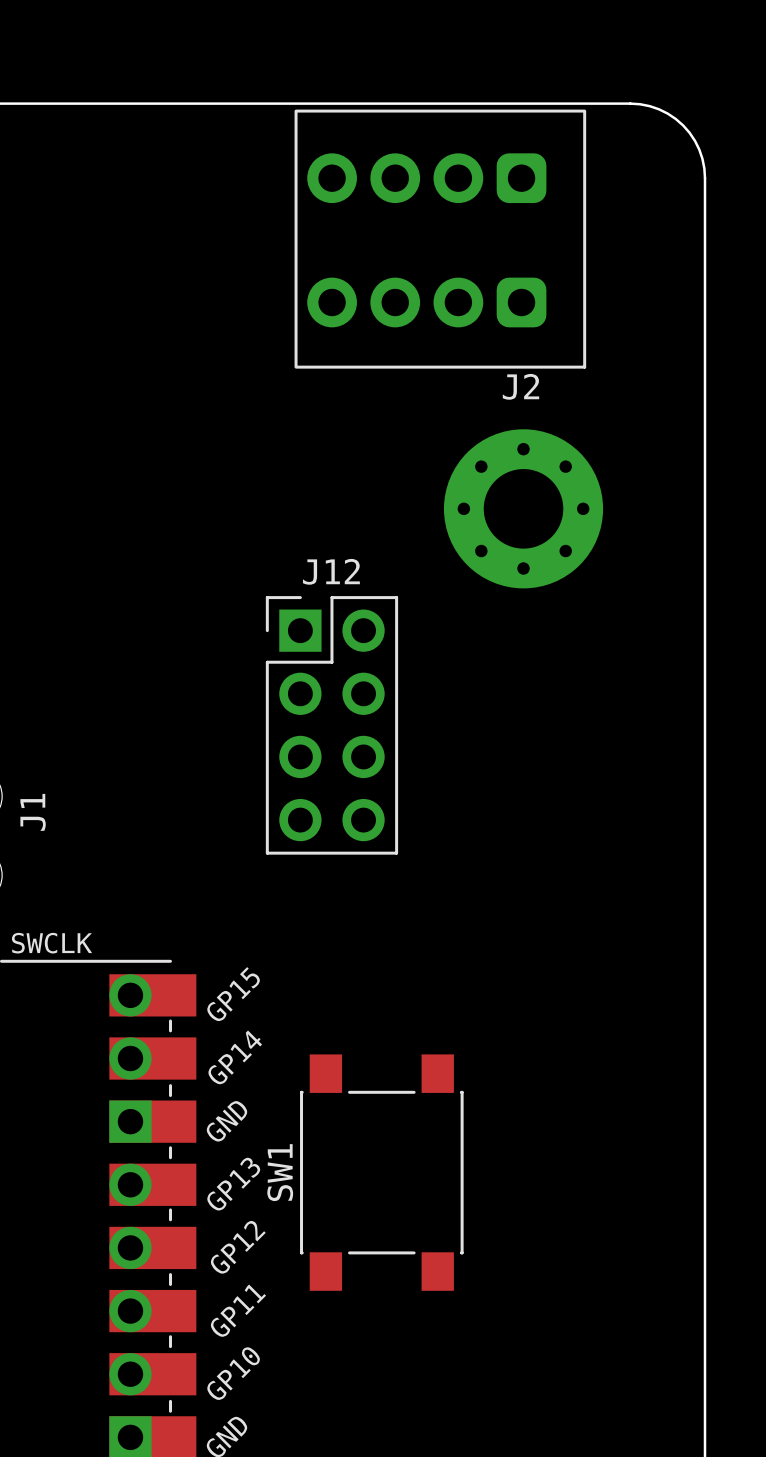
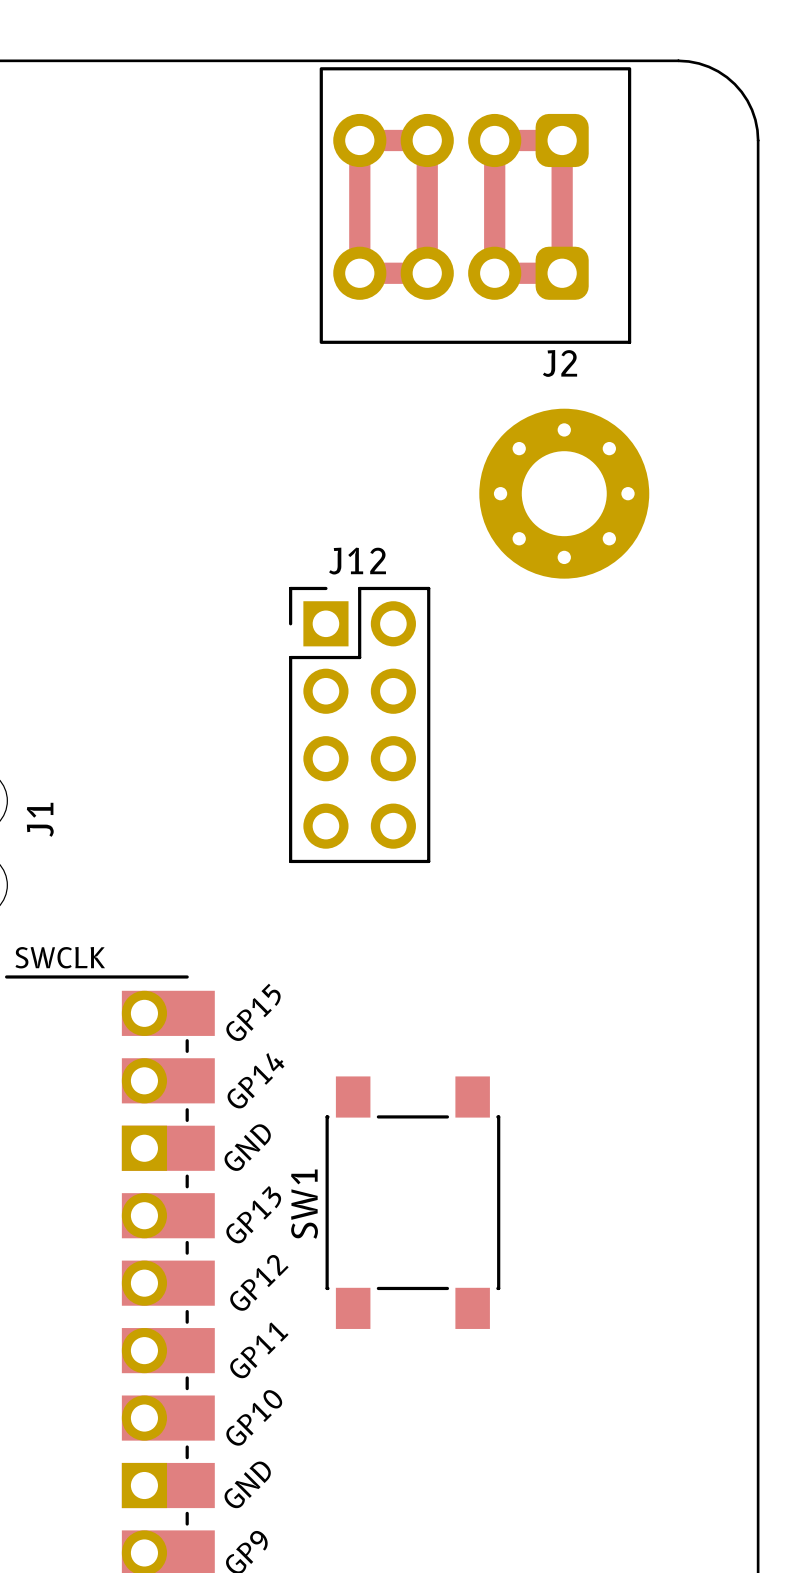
track: none -> (359, 140) (427, 140) (427, 273) (359, 273) (359, 140)
track: none -> (494, 140) (562, 140) (562, 273) (494, 273) (494, 140)

